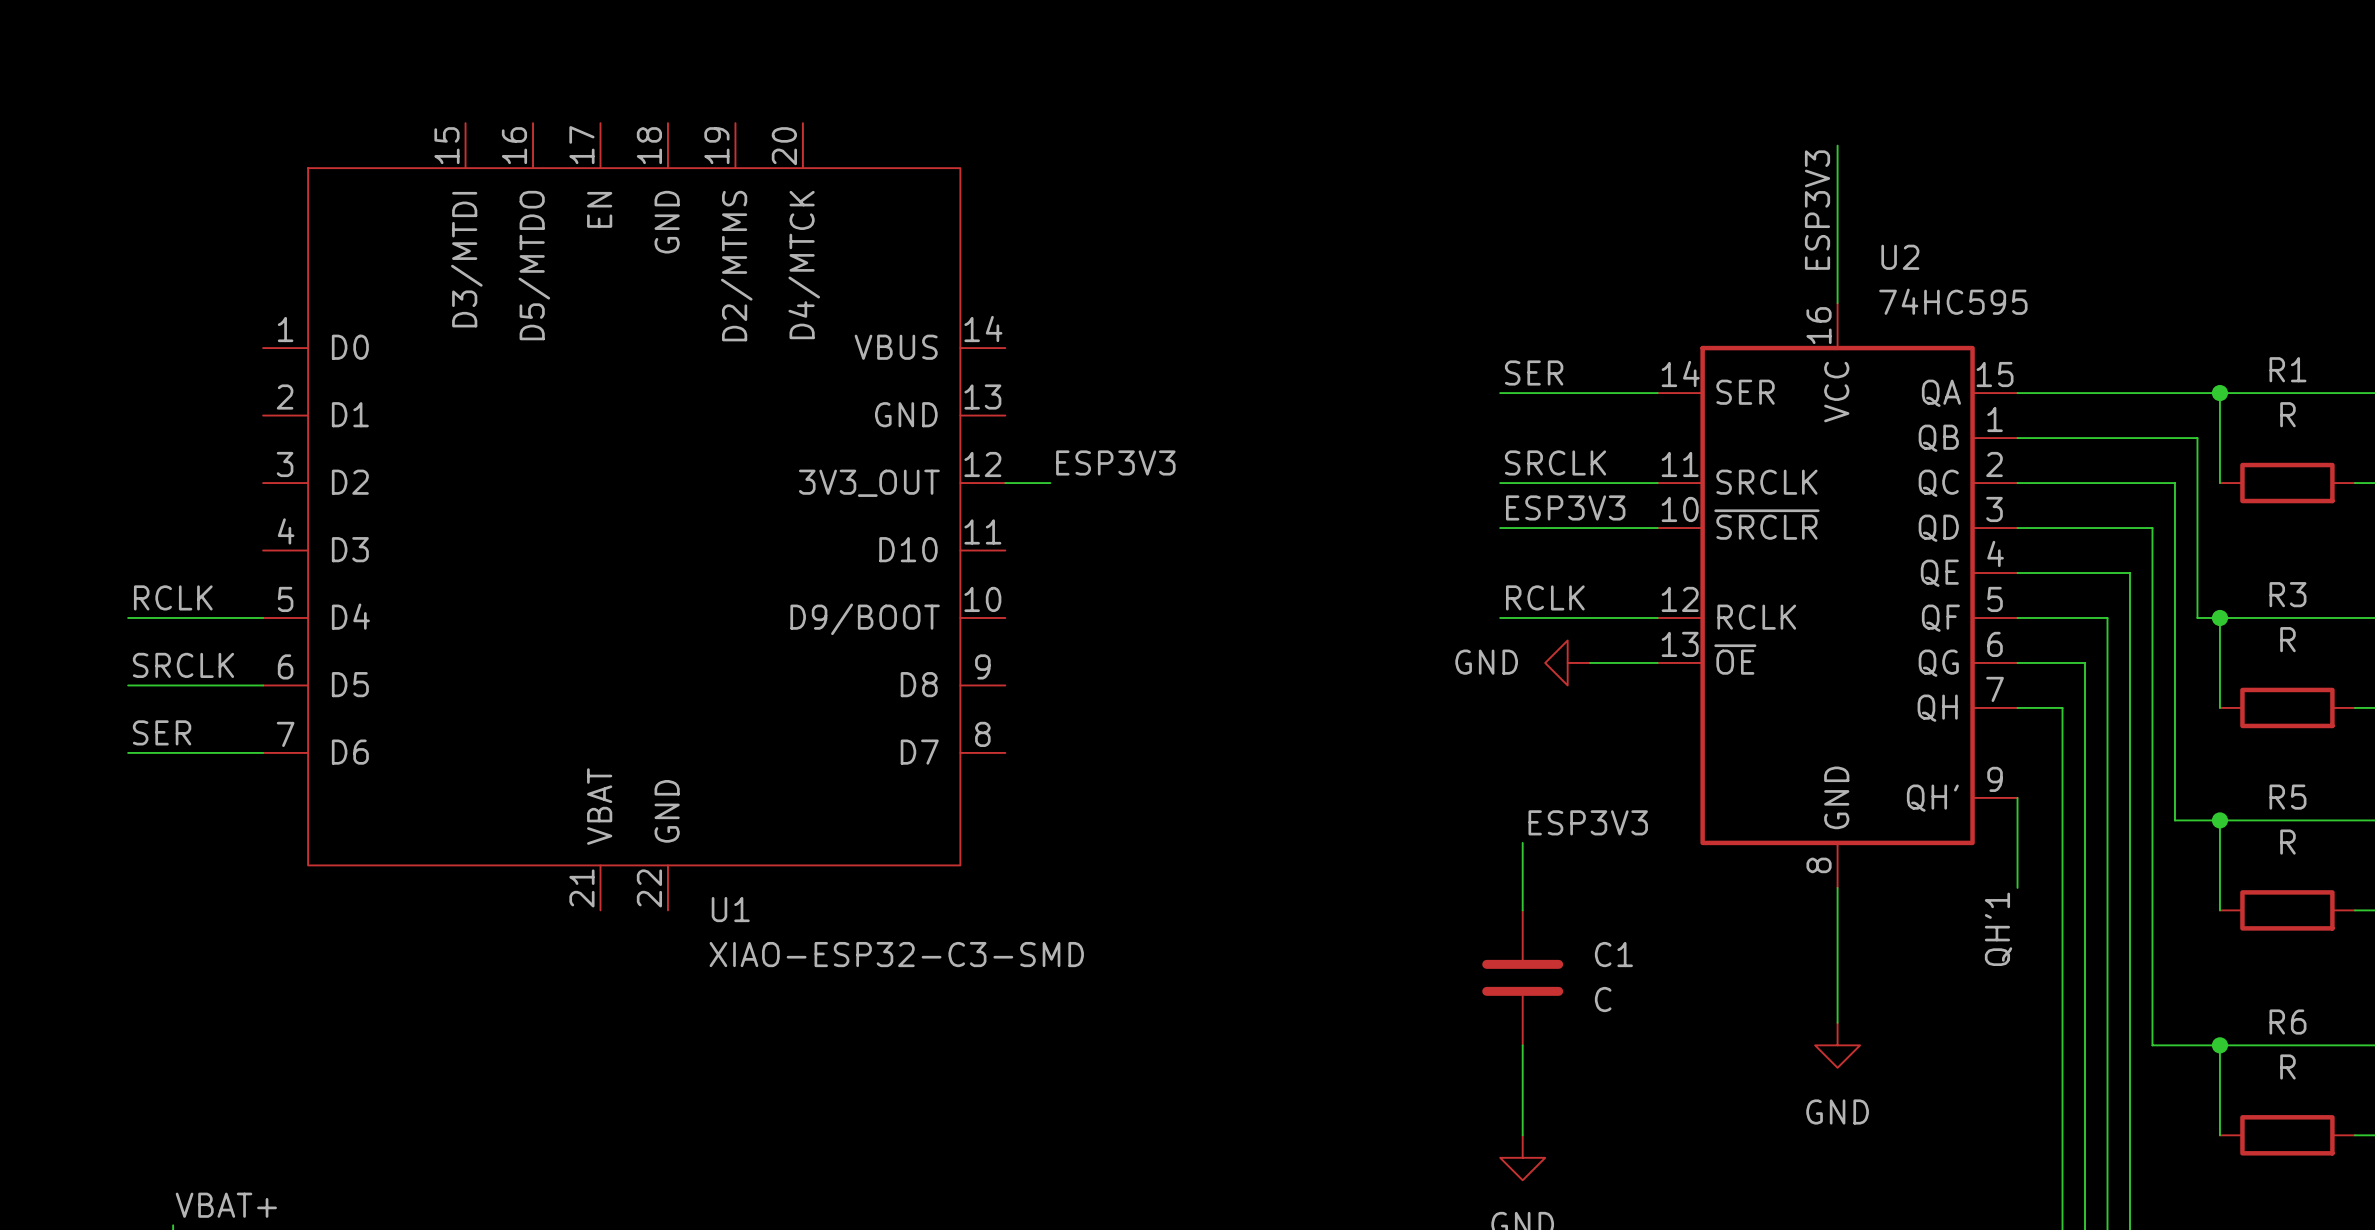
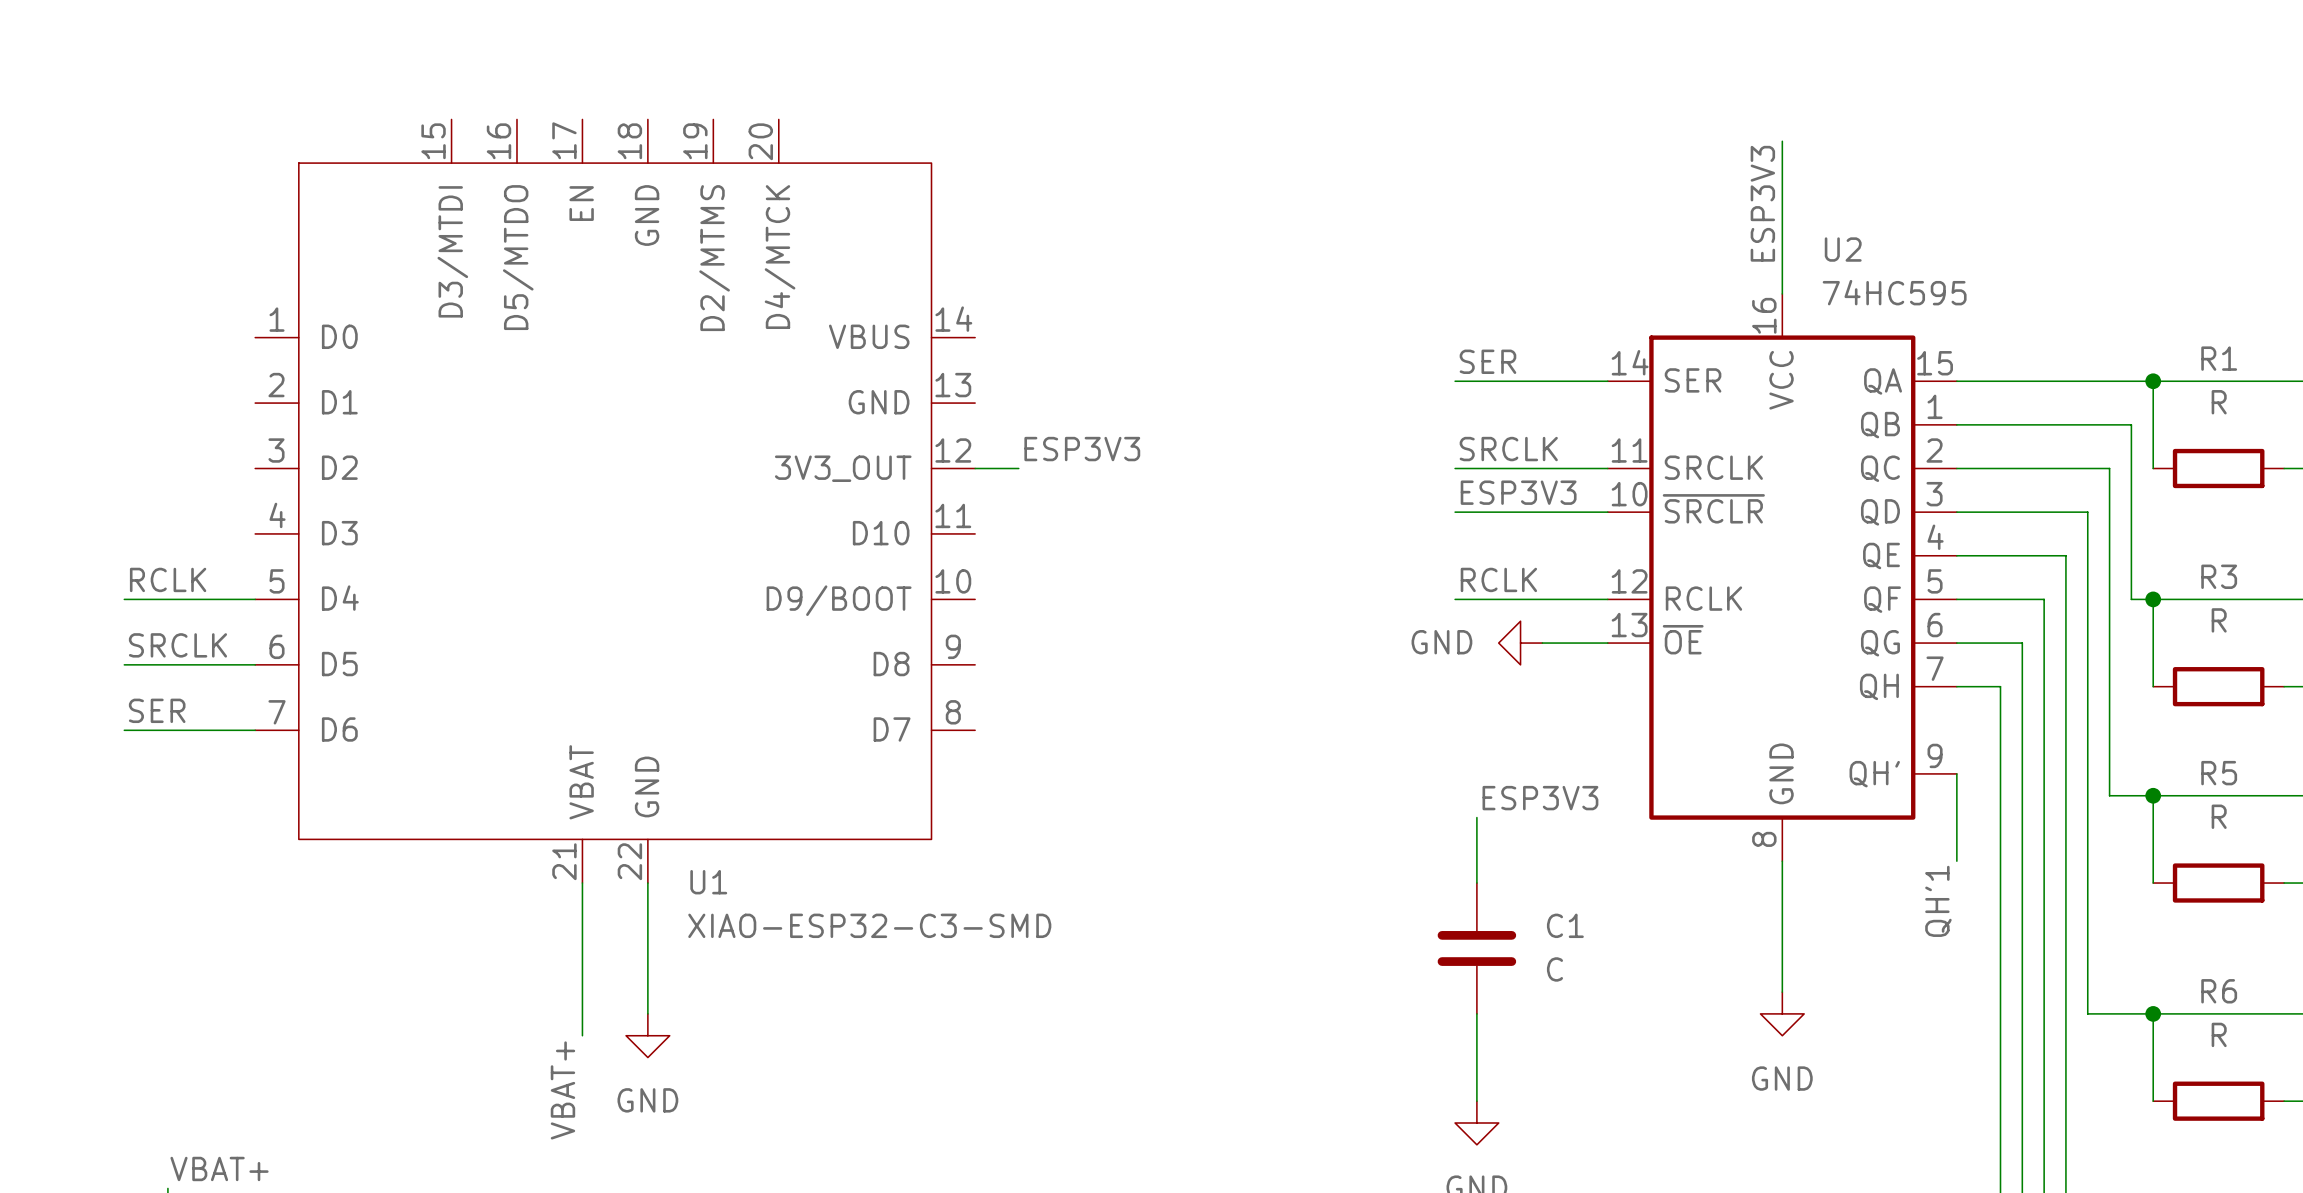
wire: none -> (582, 883) (582, 1035)
wire: none -> (647, 883) (647, 1013)
power symbol: none -> GND (647, 1035)
label: none -> VBAT+ (562, 1090)

